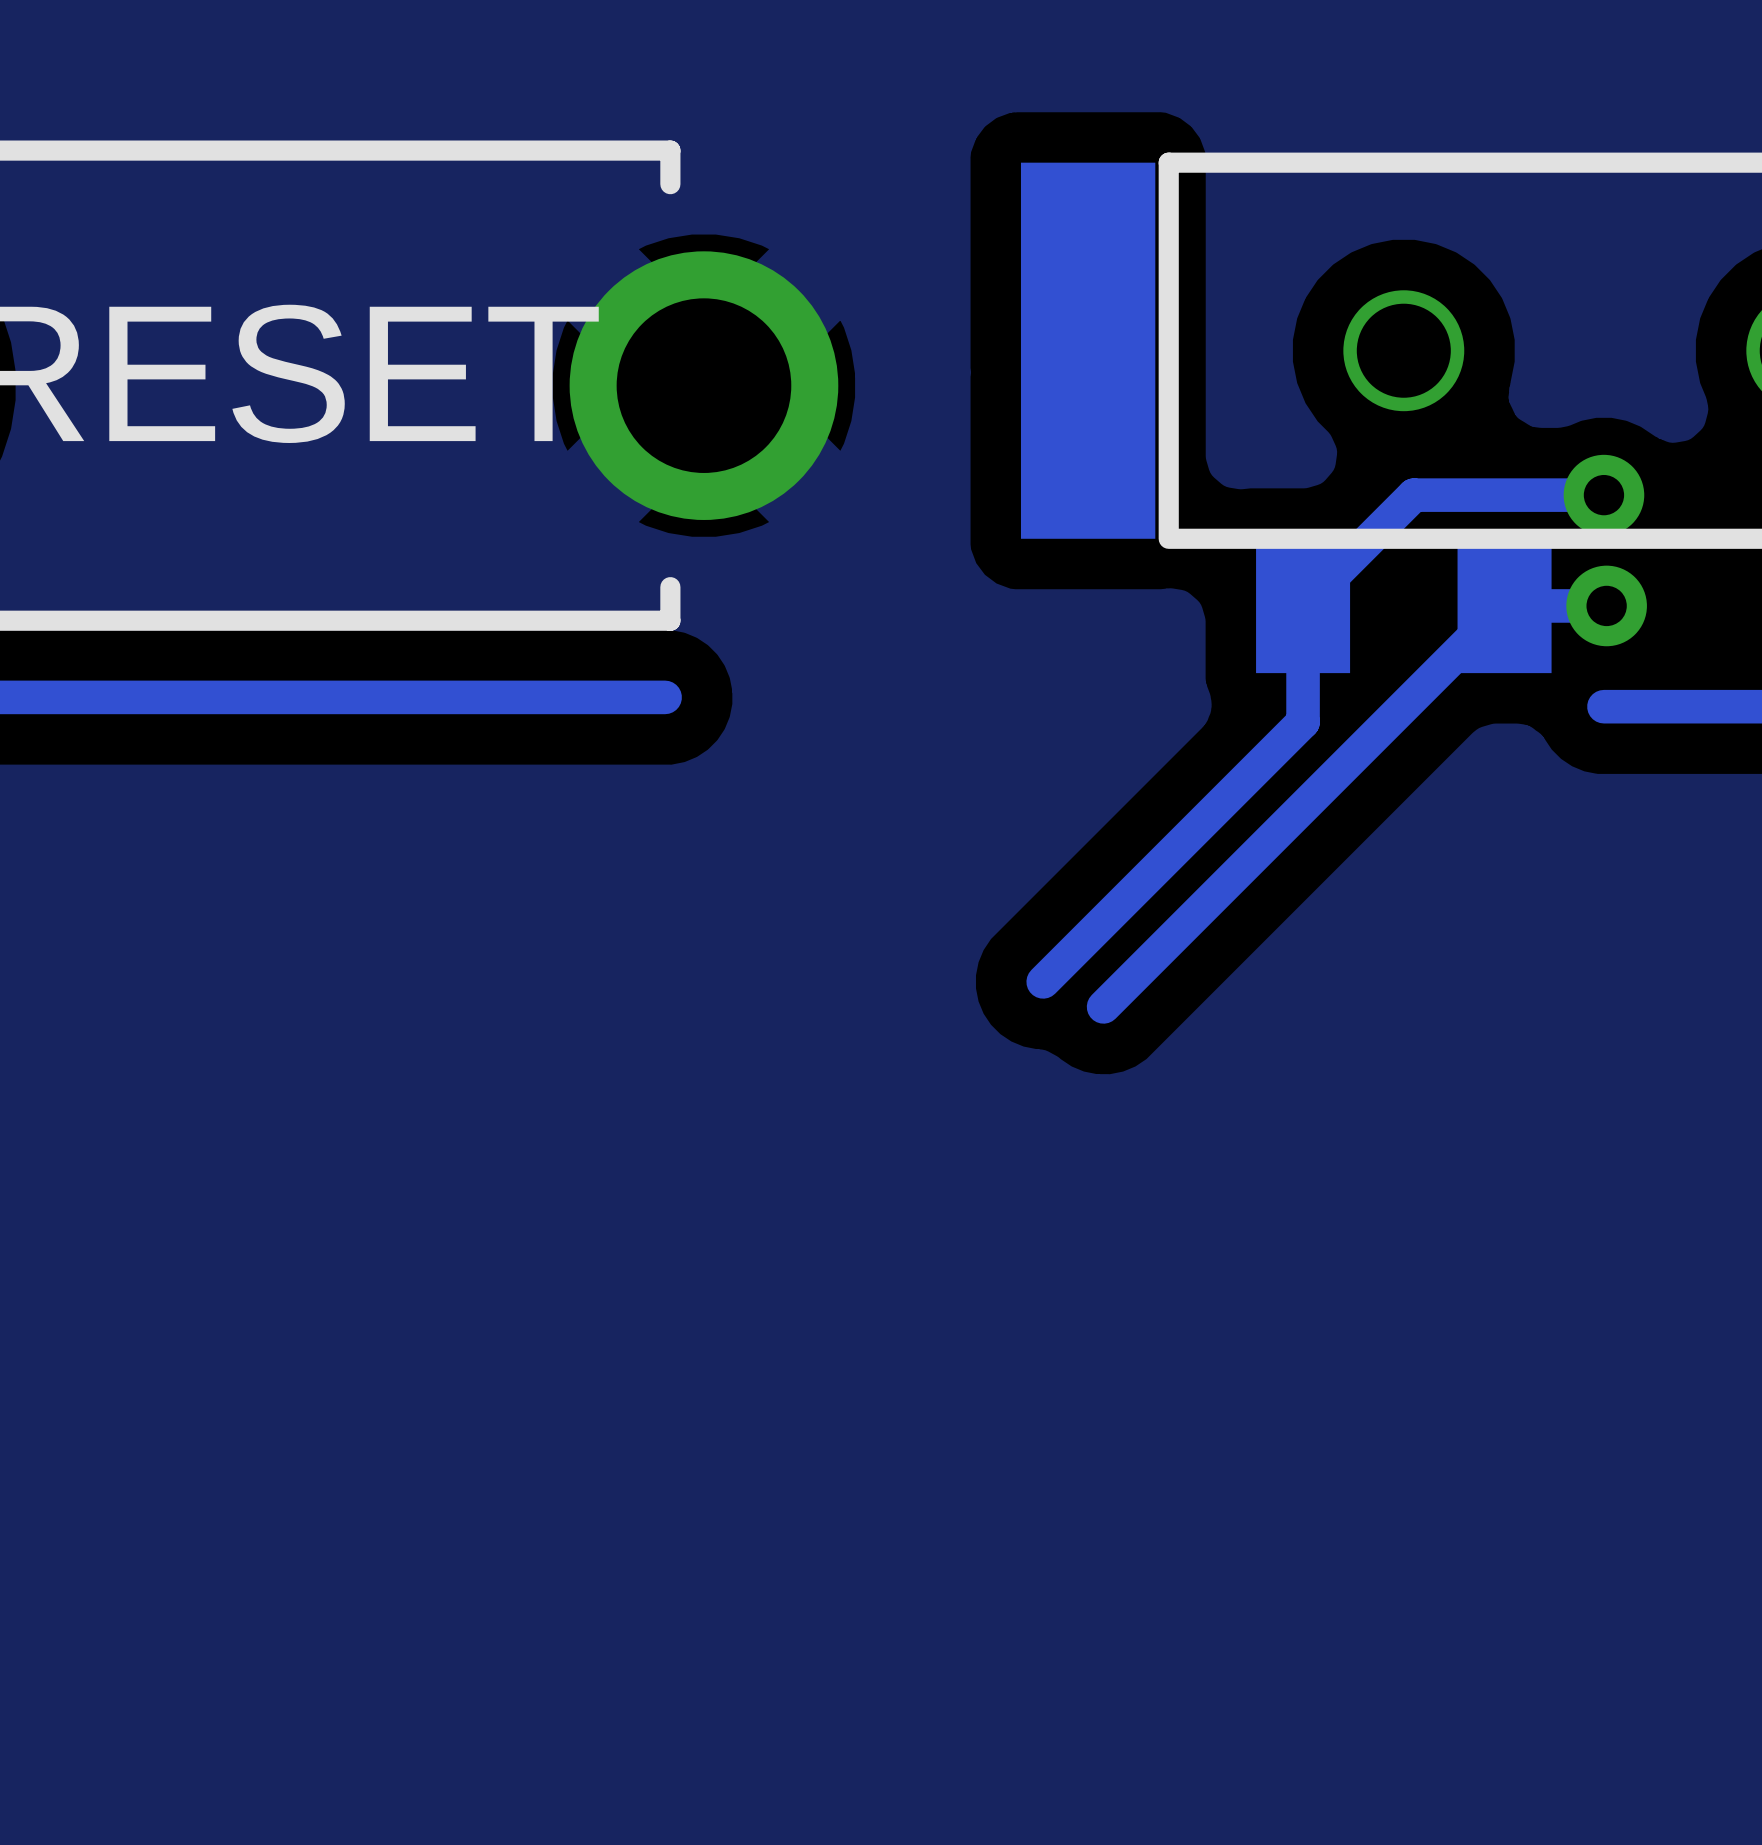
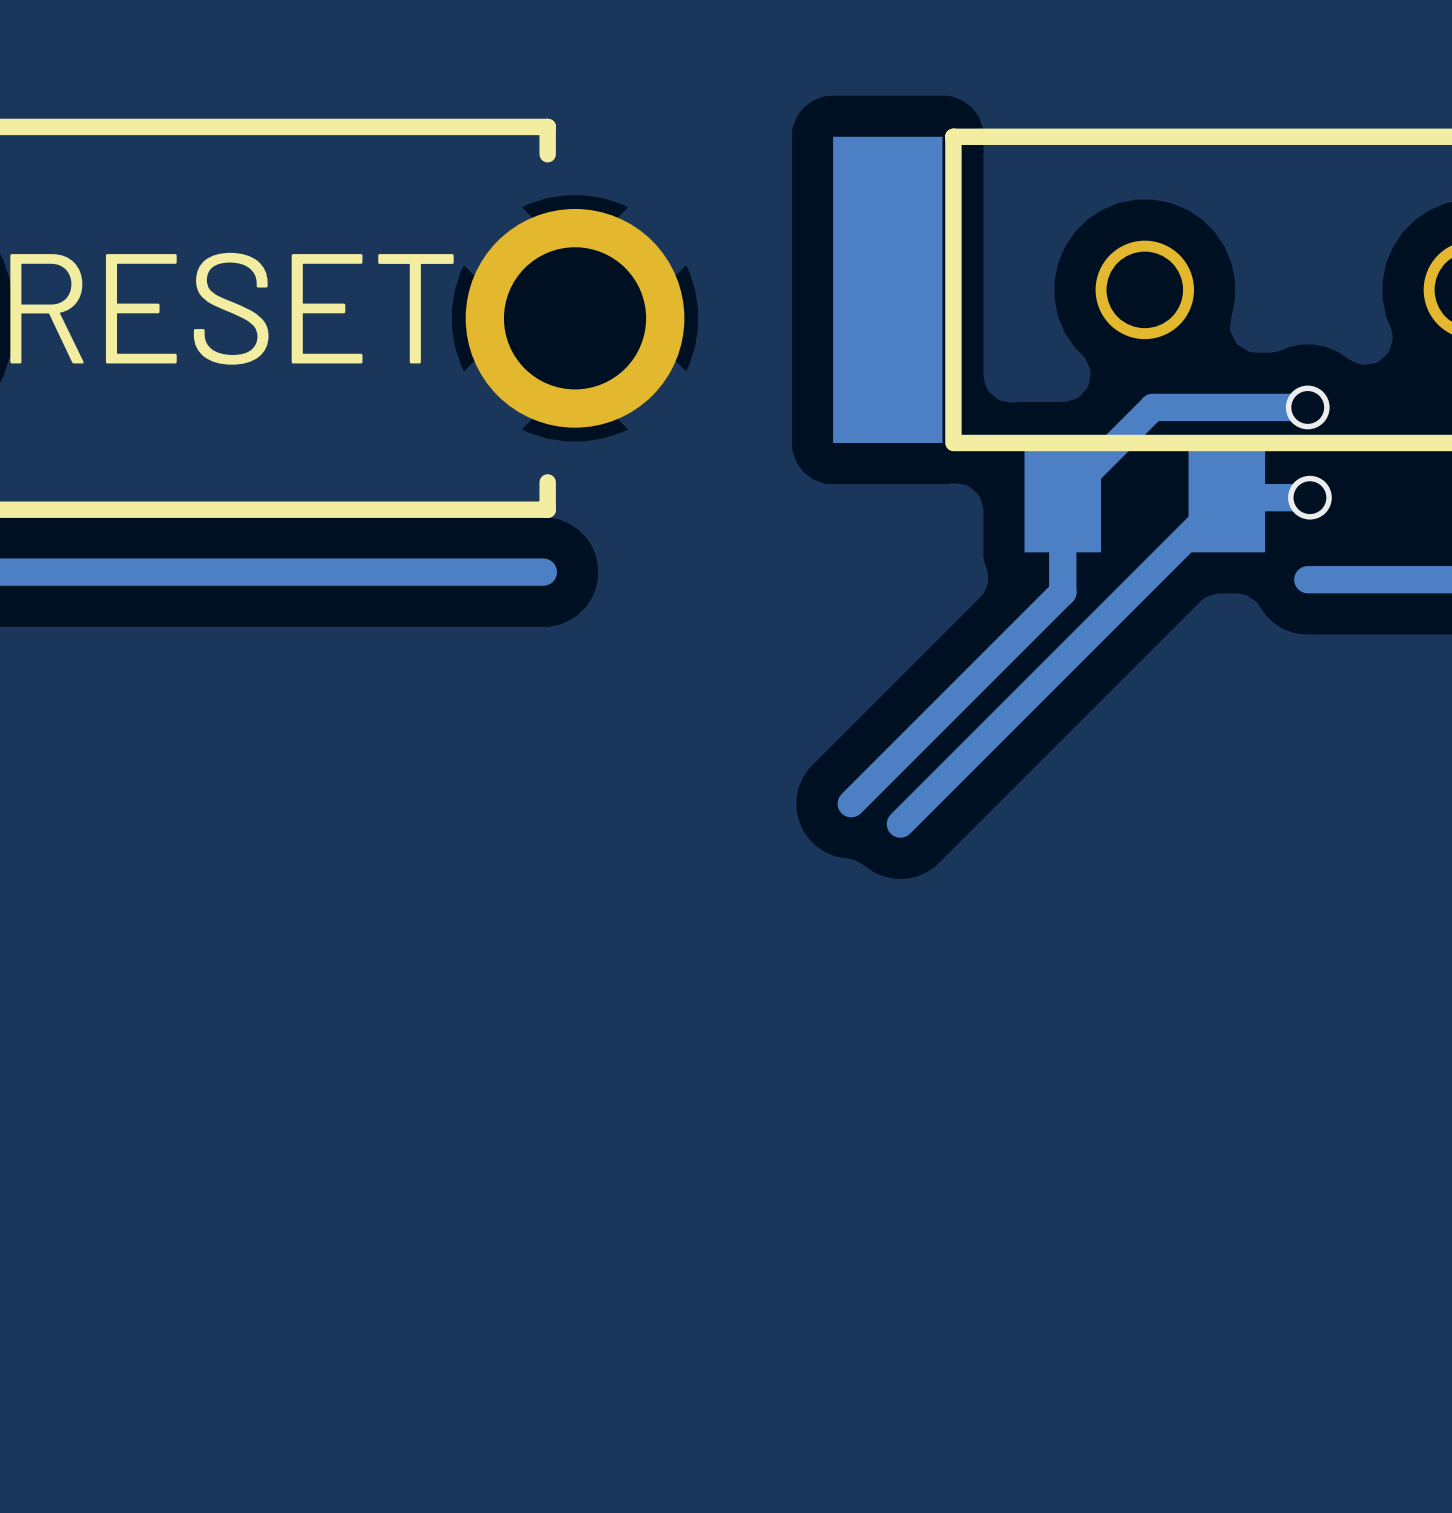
via size: [1563, 454, 1645, 536] -> [1285, 385, 1330, 430]
via size: [1566, 565, 1647, 647] -> [1288, 475, 1332, 520]

